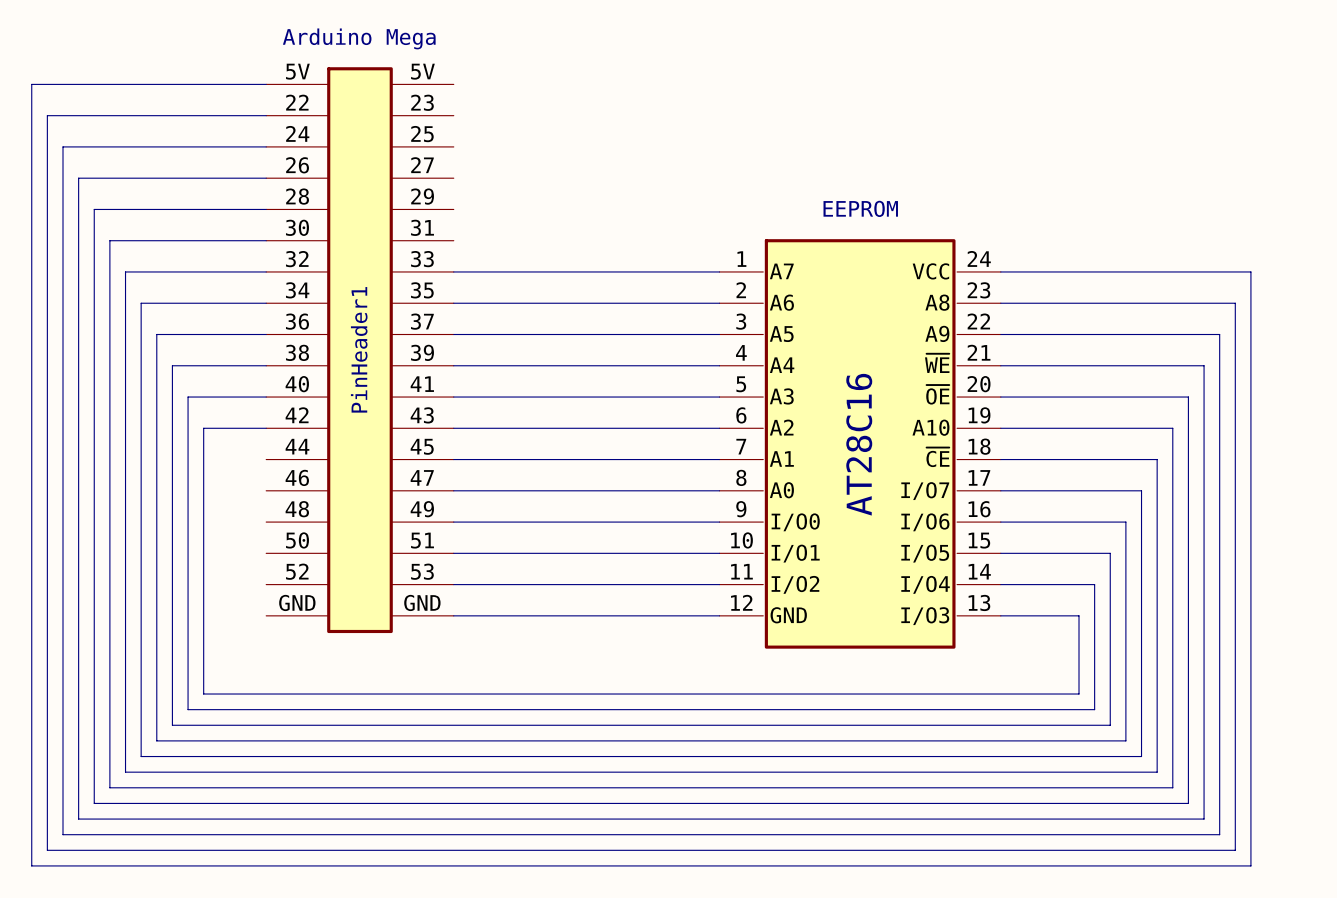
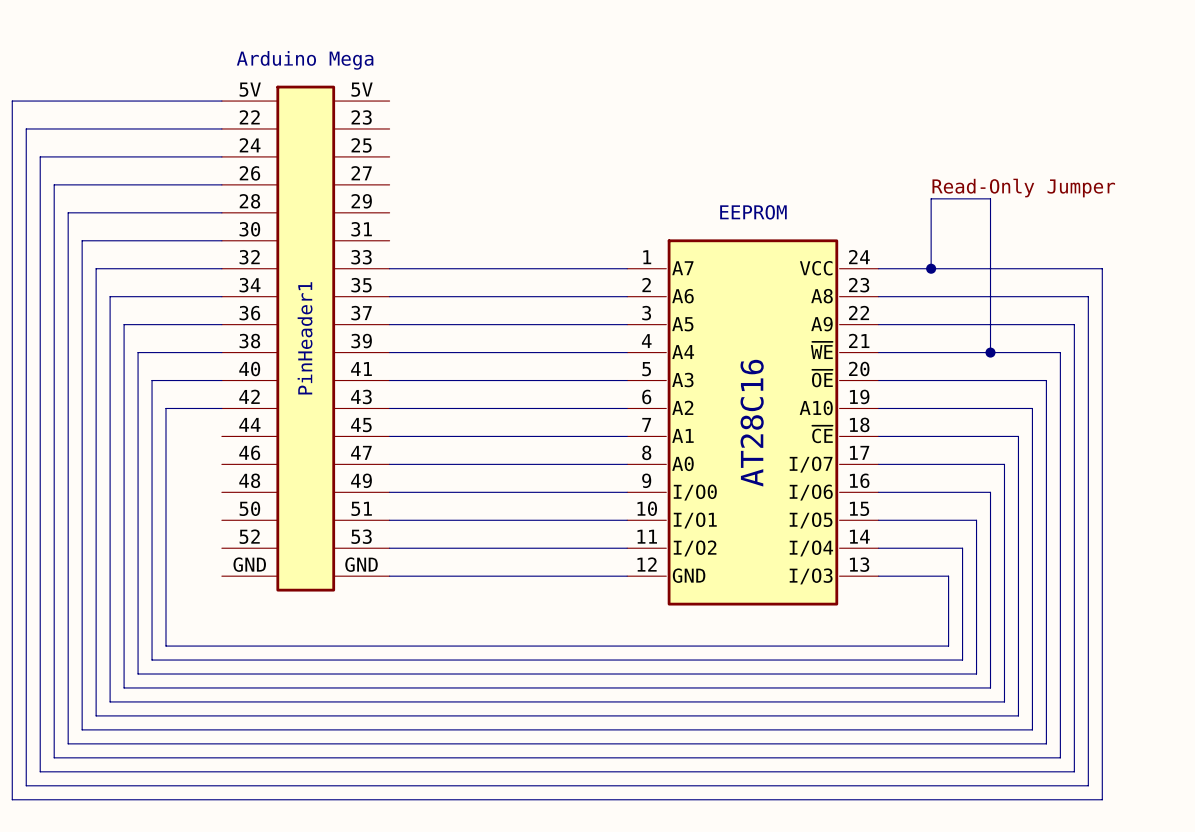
label: none -> Read-Only Jumper (1023, 188)
wire: none -> (931, 268) (931, 198) (990, 198) (990, 352)
junction: none -> (931, 268)
junction: none -> (990, 352)

